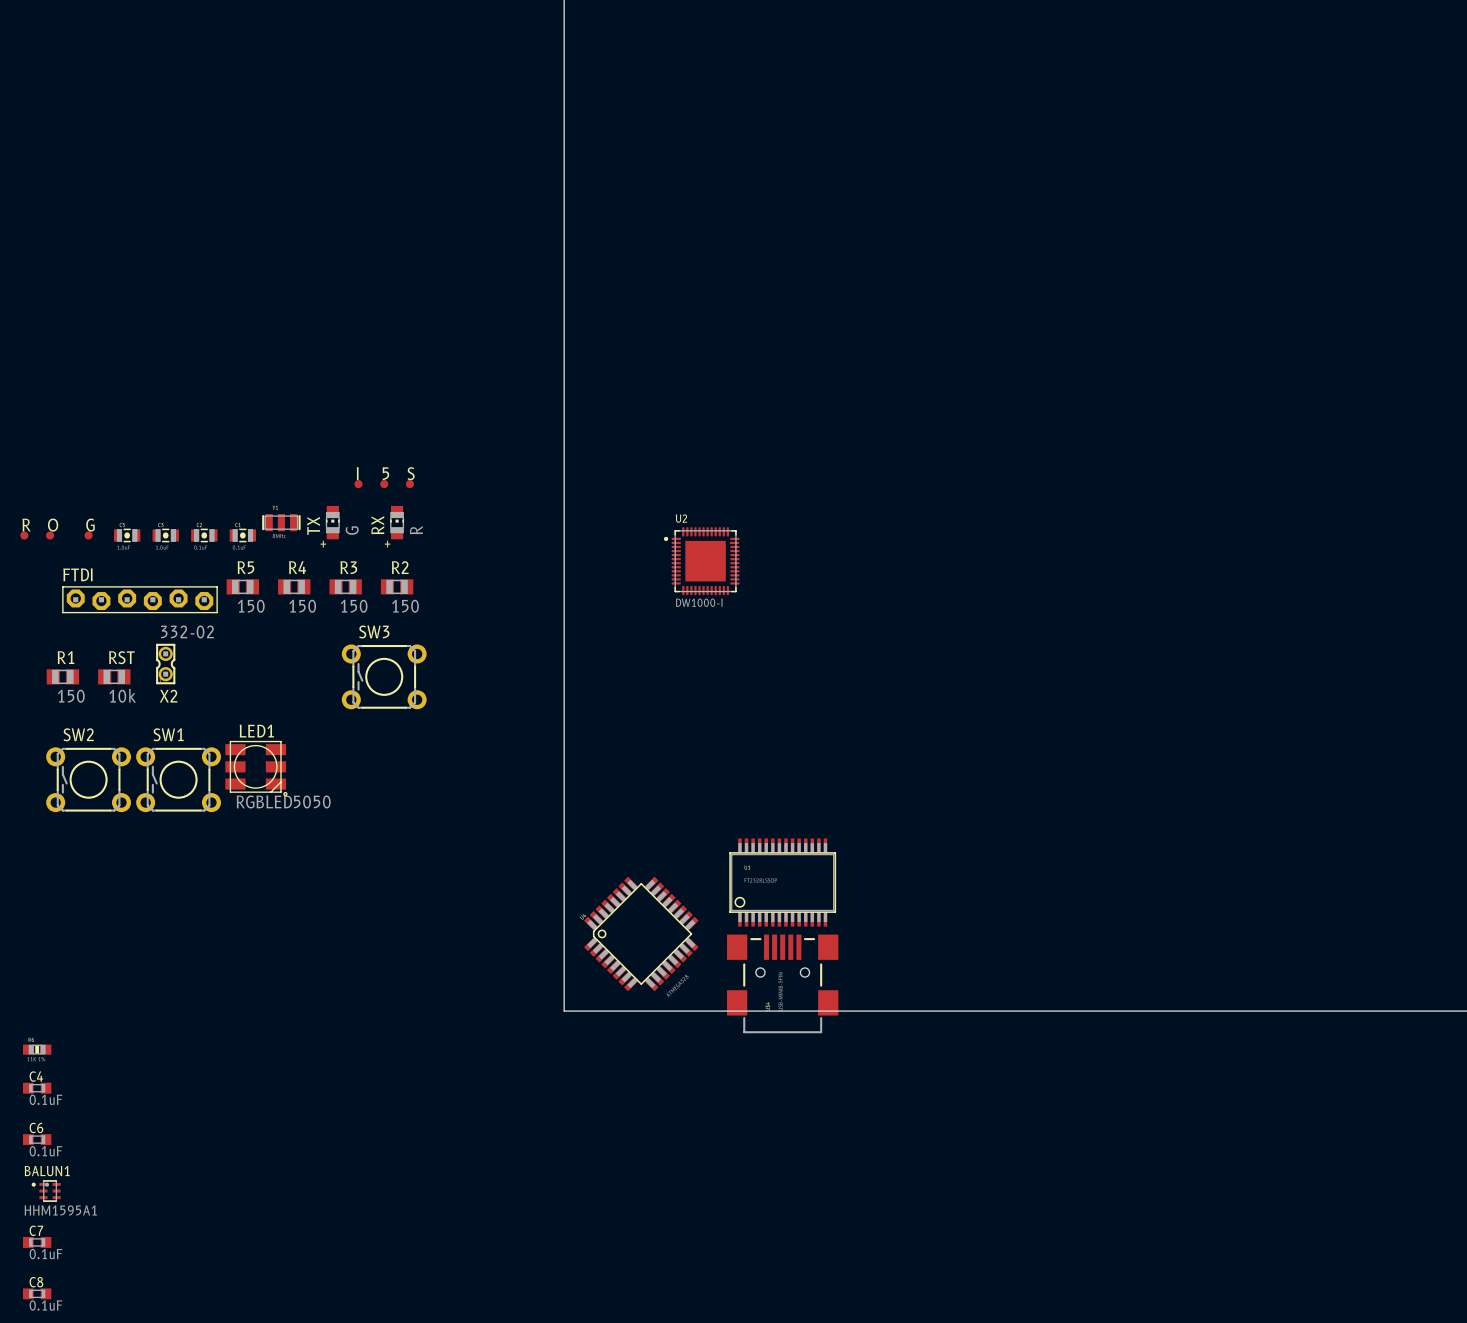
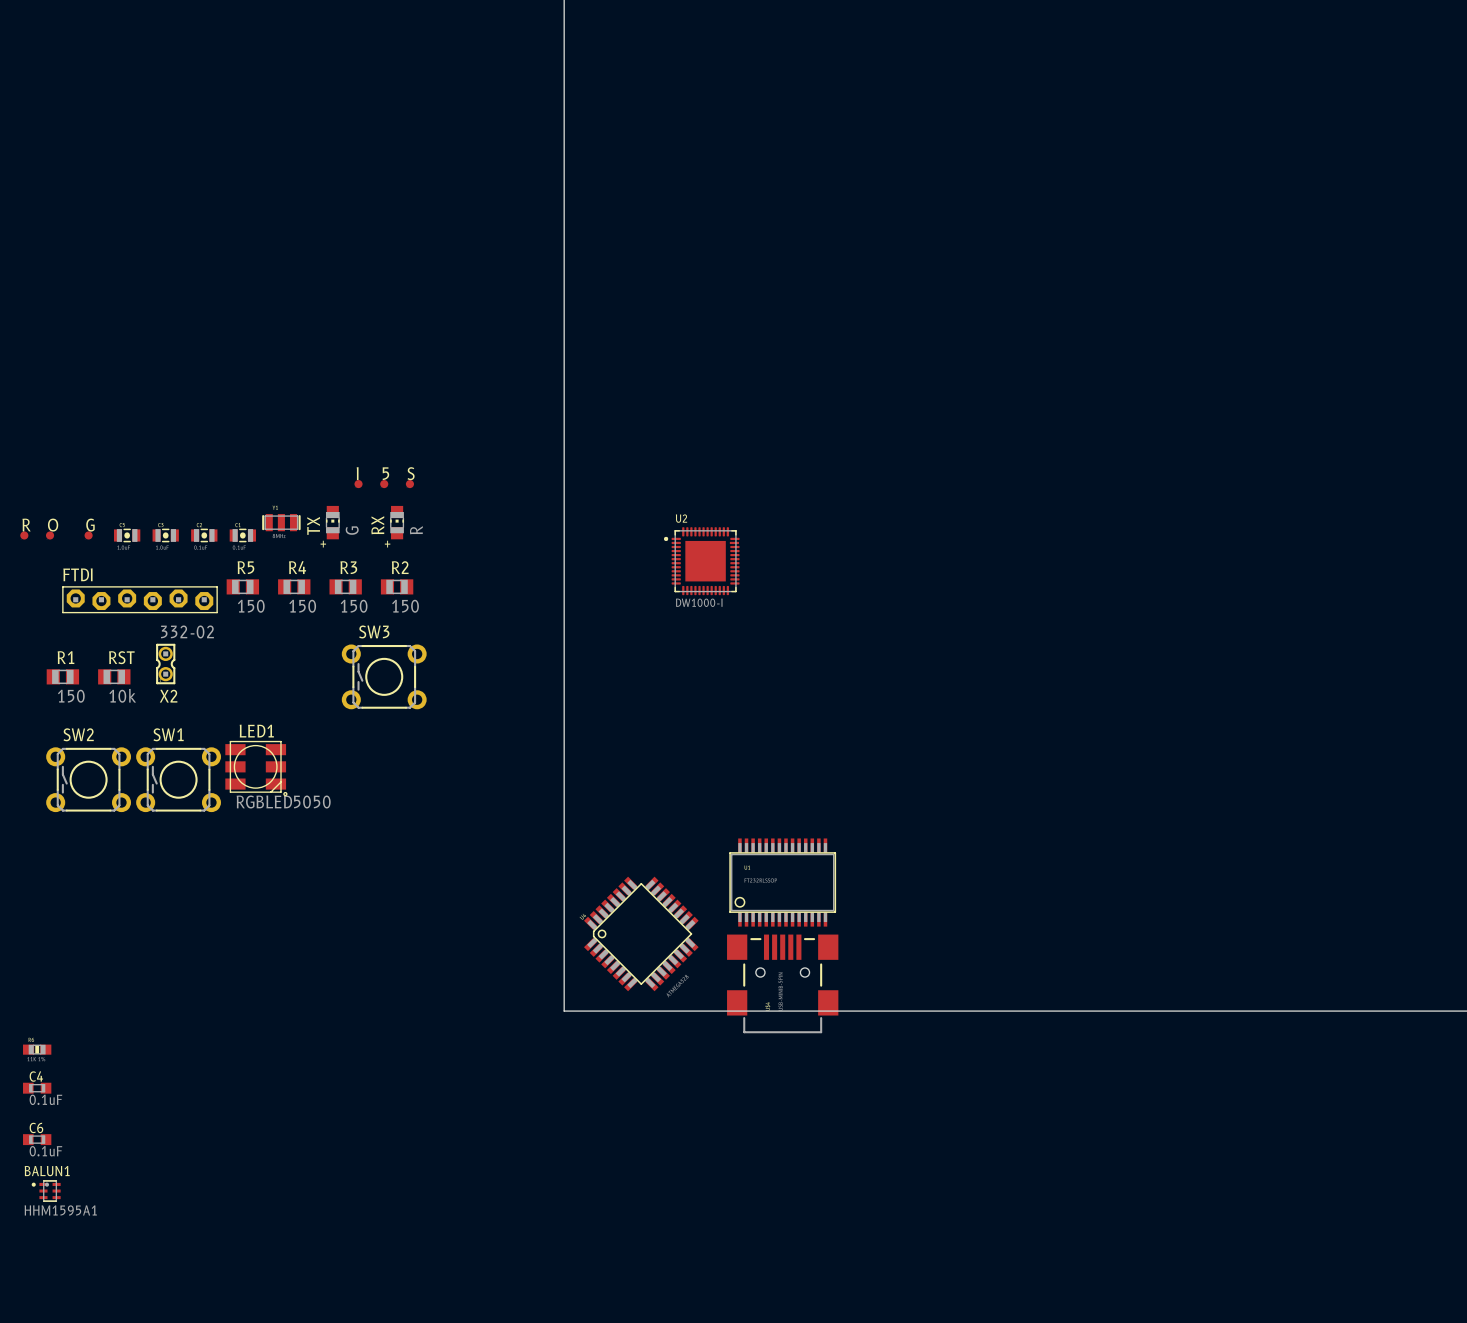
C7: 0.1uF (37, 1242) -> none
C8: 0.1uF (37, 1293) -> none

